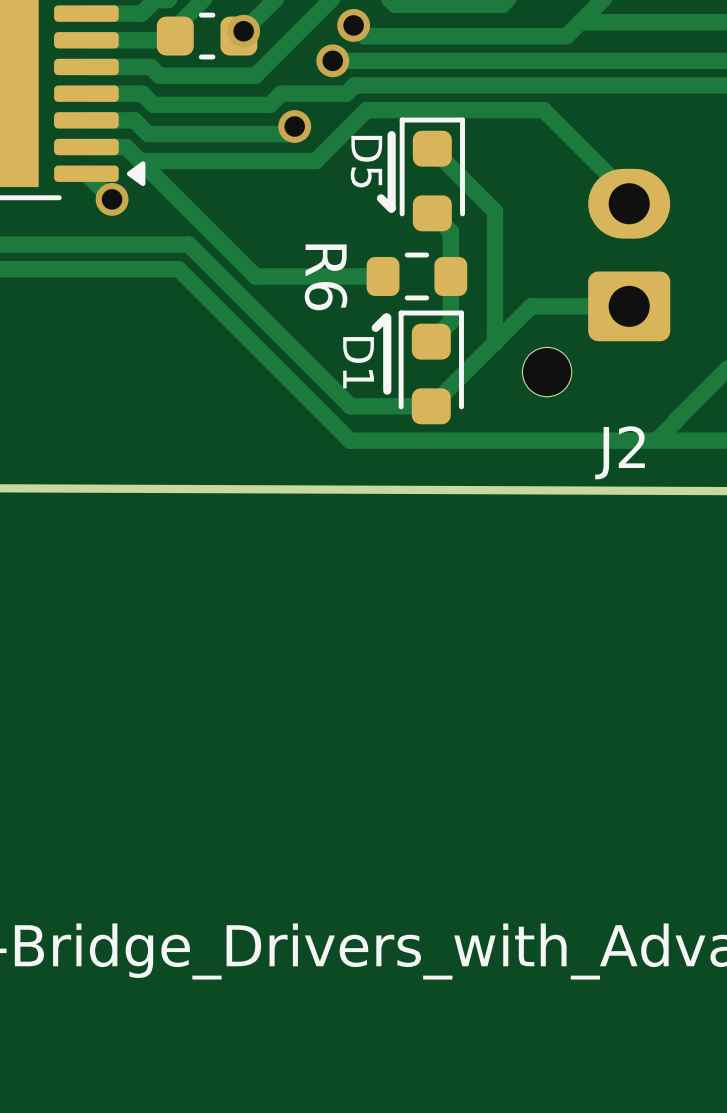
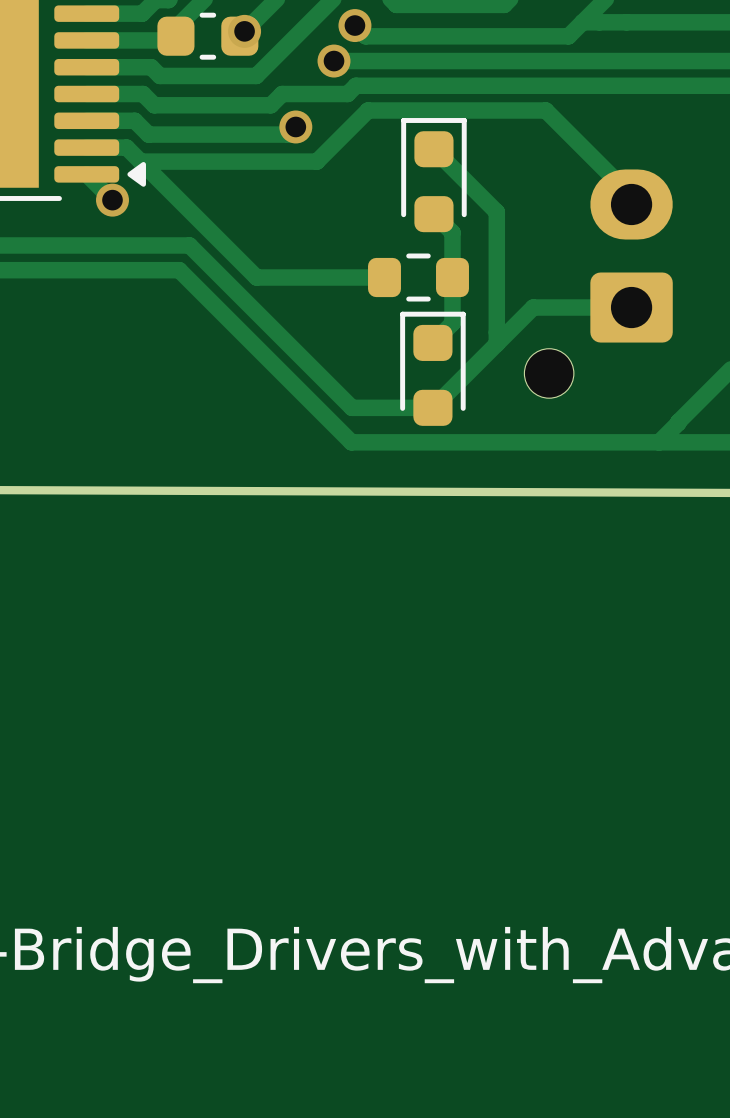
line: (391, 135) (391, 208) -> none
D5 name: D5 (366, 161) -> none
line: (381, 198) (391, 208) -> none
R6 name: R6 (326, 277) -> none
line: (386, 317) (375, 327) -> none
line: (387, 317) (387, 390) -> none
D1 name: D1 (358, 362) -> none
J2 name: J2 (619, 452) -> none

